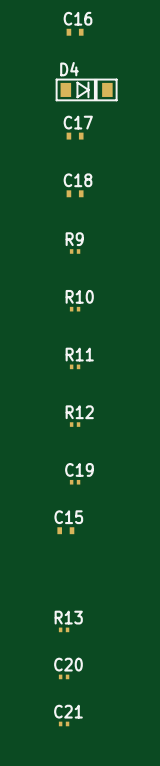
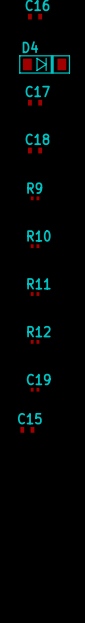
R13: (64, 629) -> none
C20: (64, 676) -> none
C21: (64, 723) -> none

